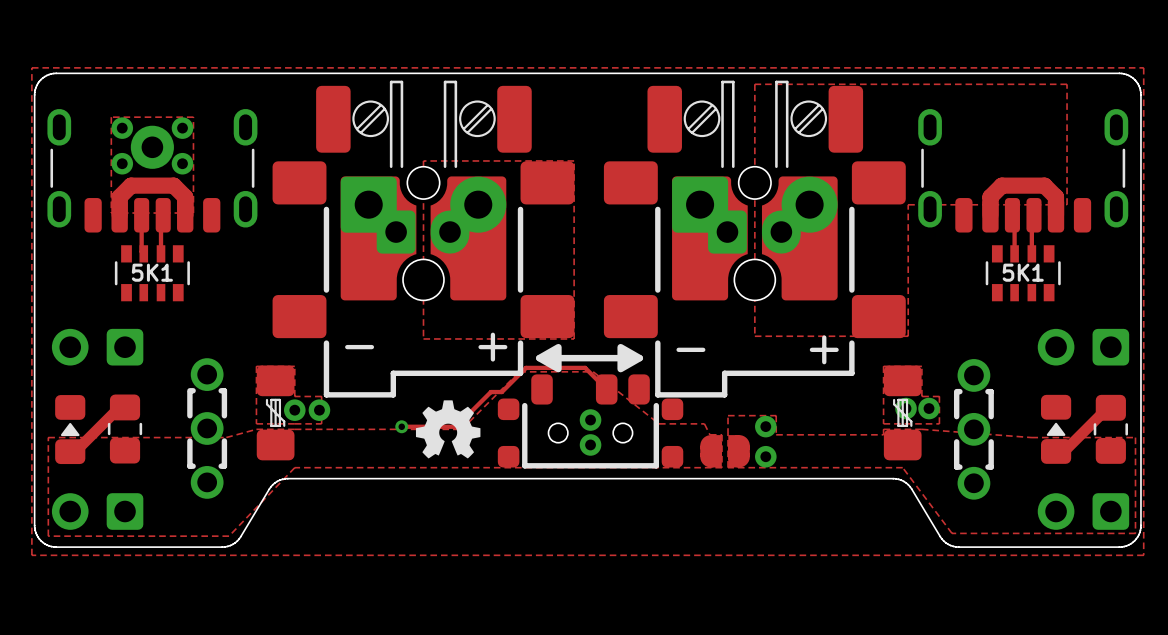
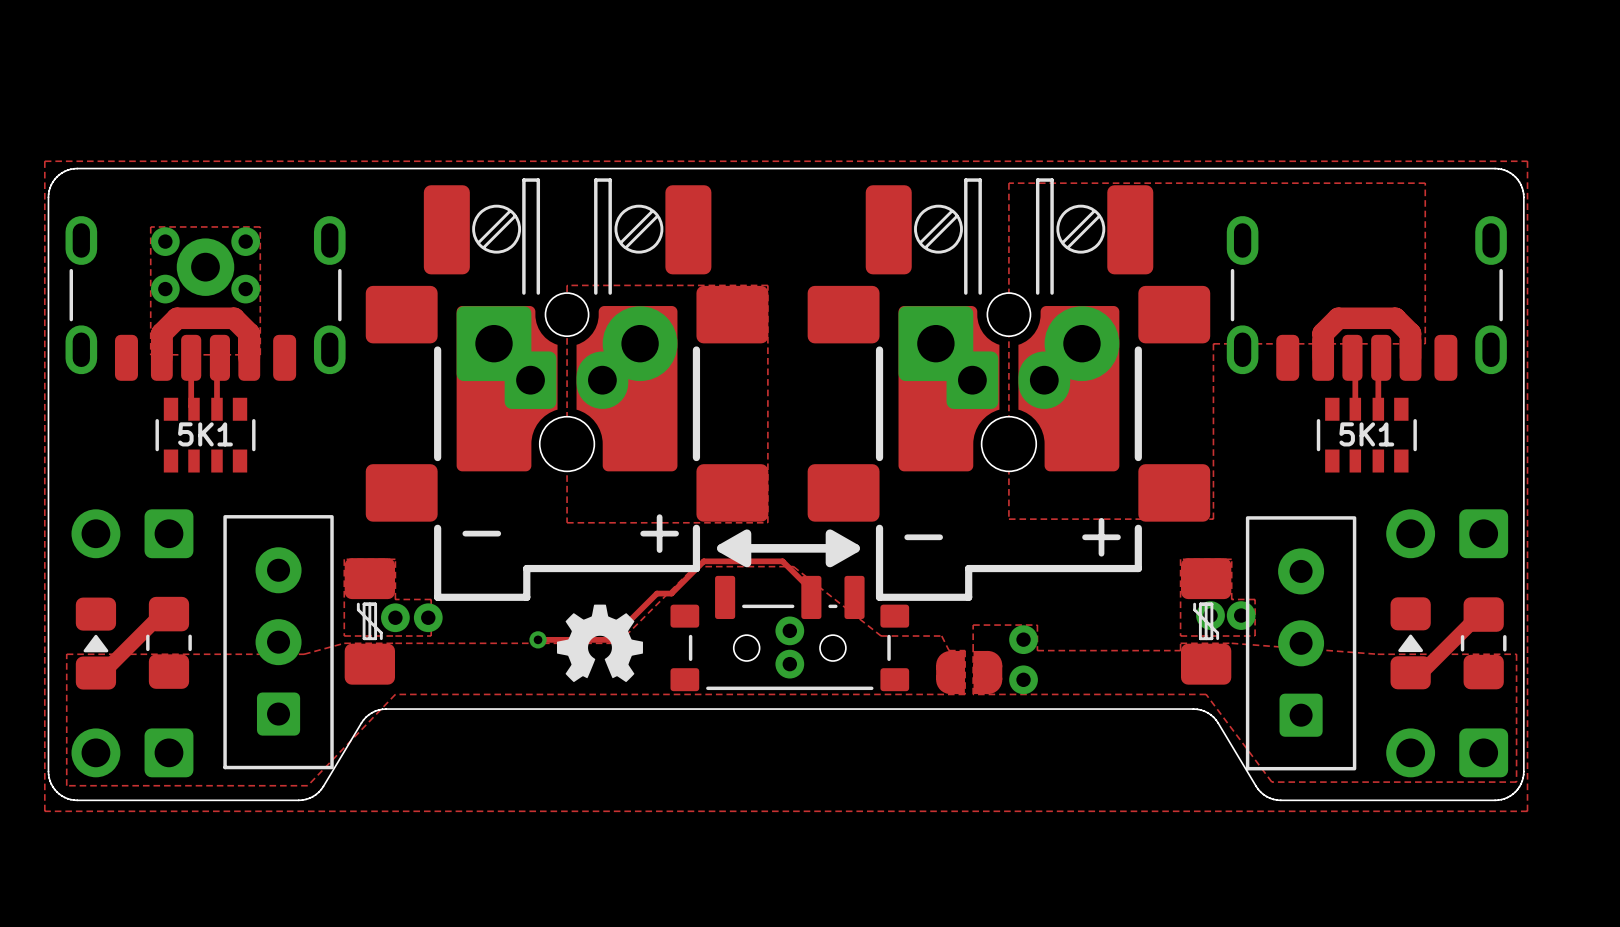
part footprint: [187, 358, 228, 499] -> [223, 515, 334, 770]
part footprint: [953, 359, 994, 500] -> [1245, 516, 1357, 771]
part footprint: [497, 374, 684, 469] -> [670, 575, 910, 692]

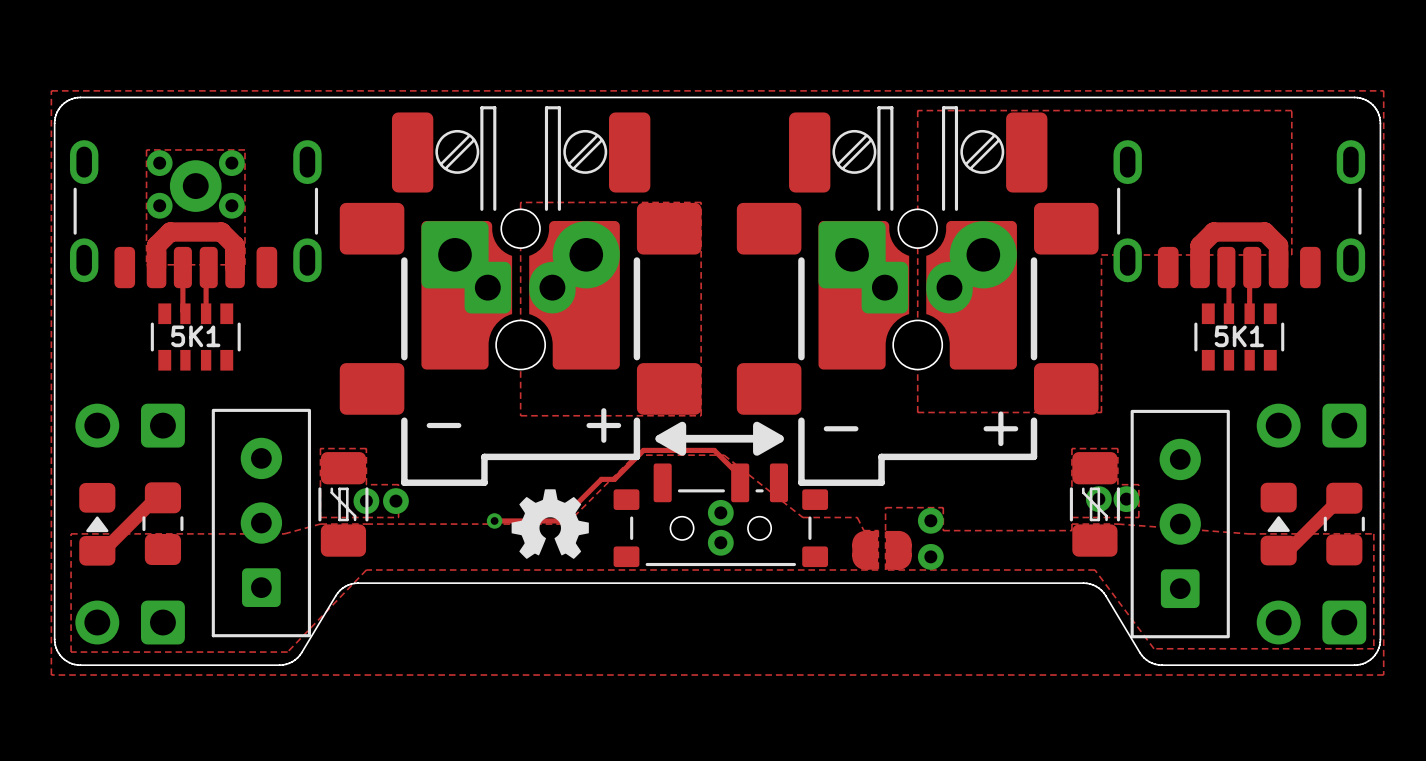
part footprint: [344, 558, 396, 685] -> [318, 452, 369, 557]
part footprint: [1180, 558, 1232, 685] -> [1069, 452, 1120, 557]

